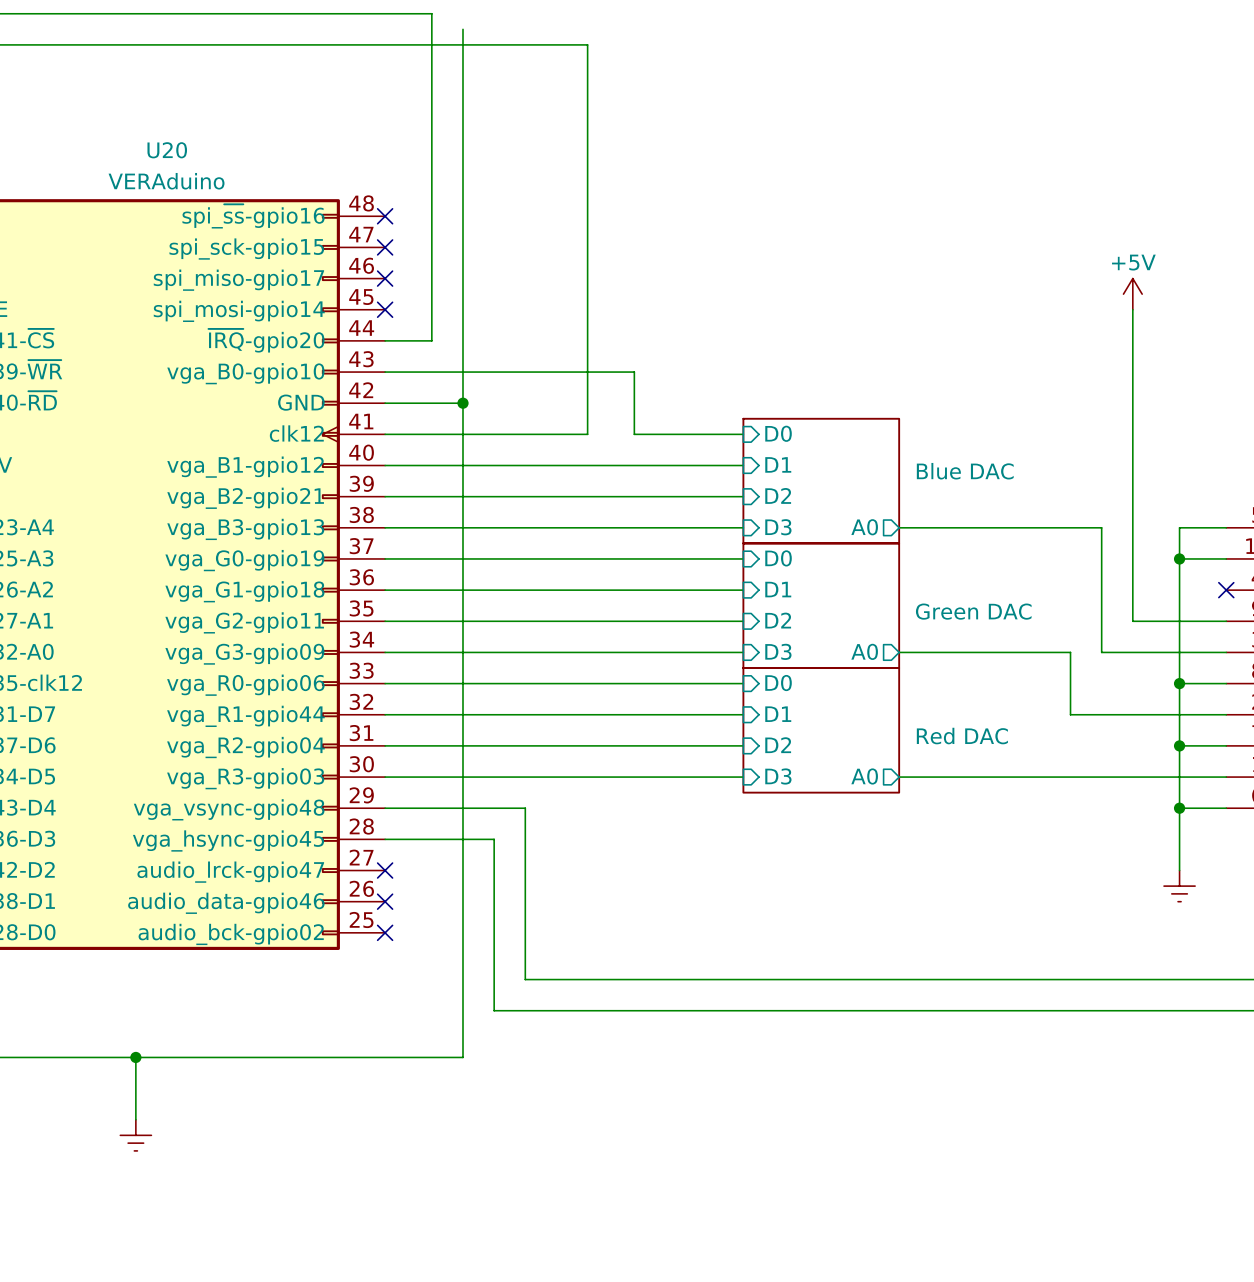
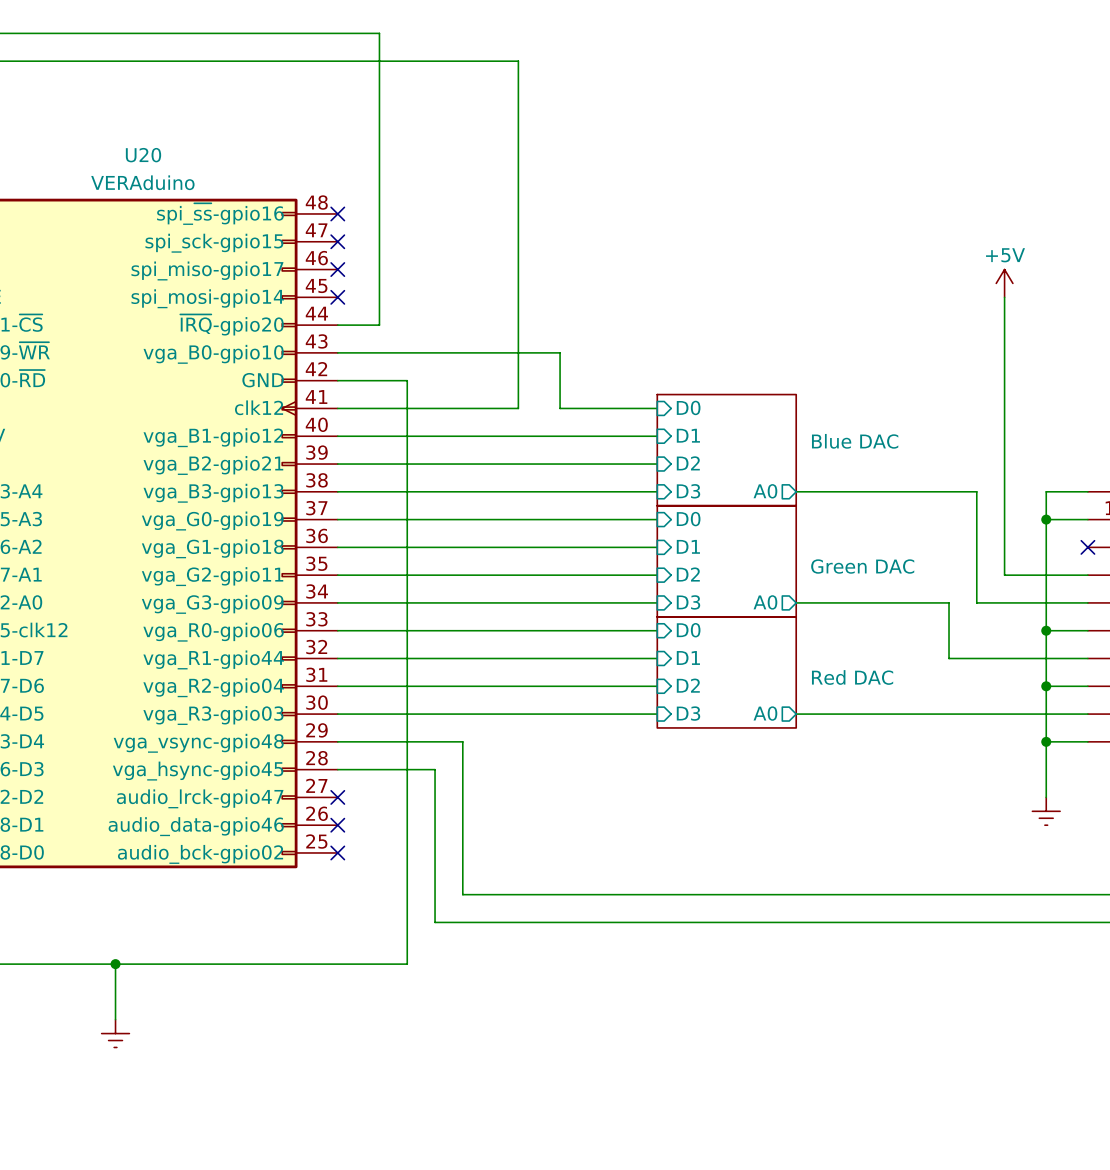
wire: (462, 29) (462, 403) -> none
junction: (462, 403) -> none

